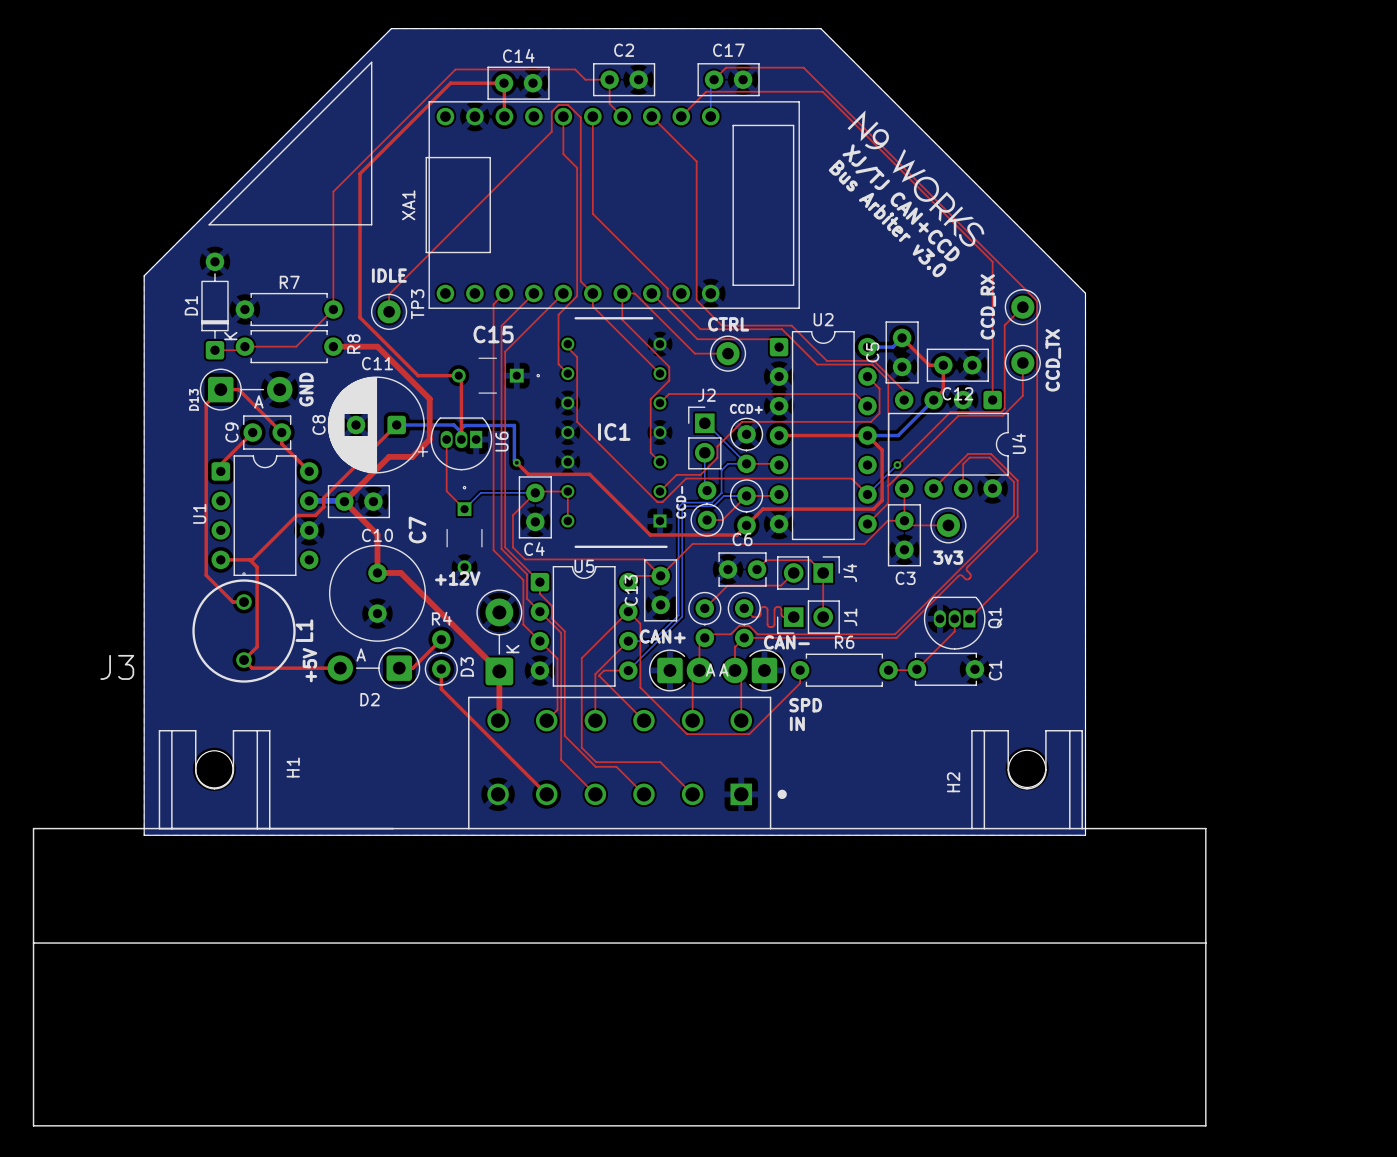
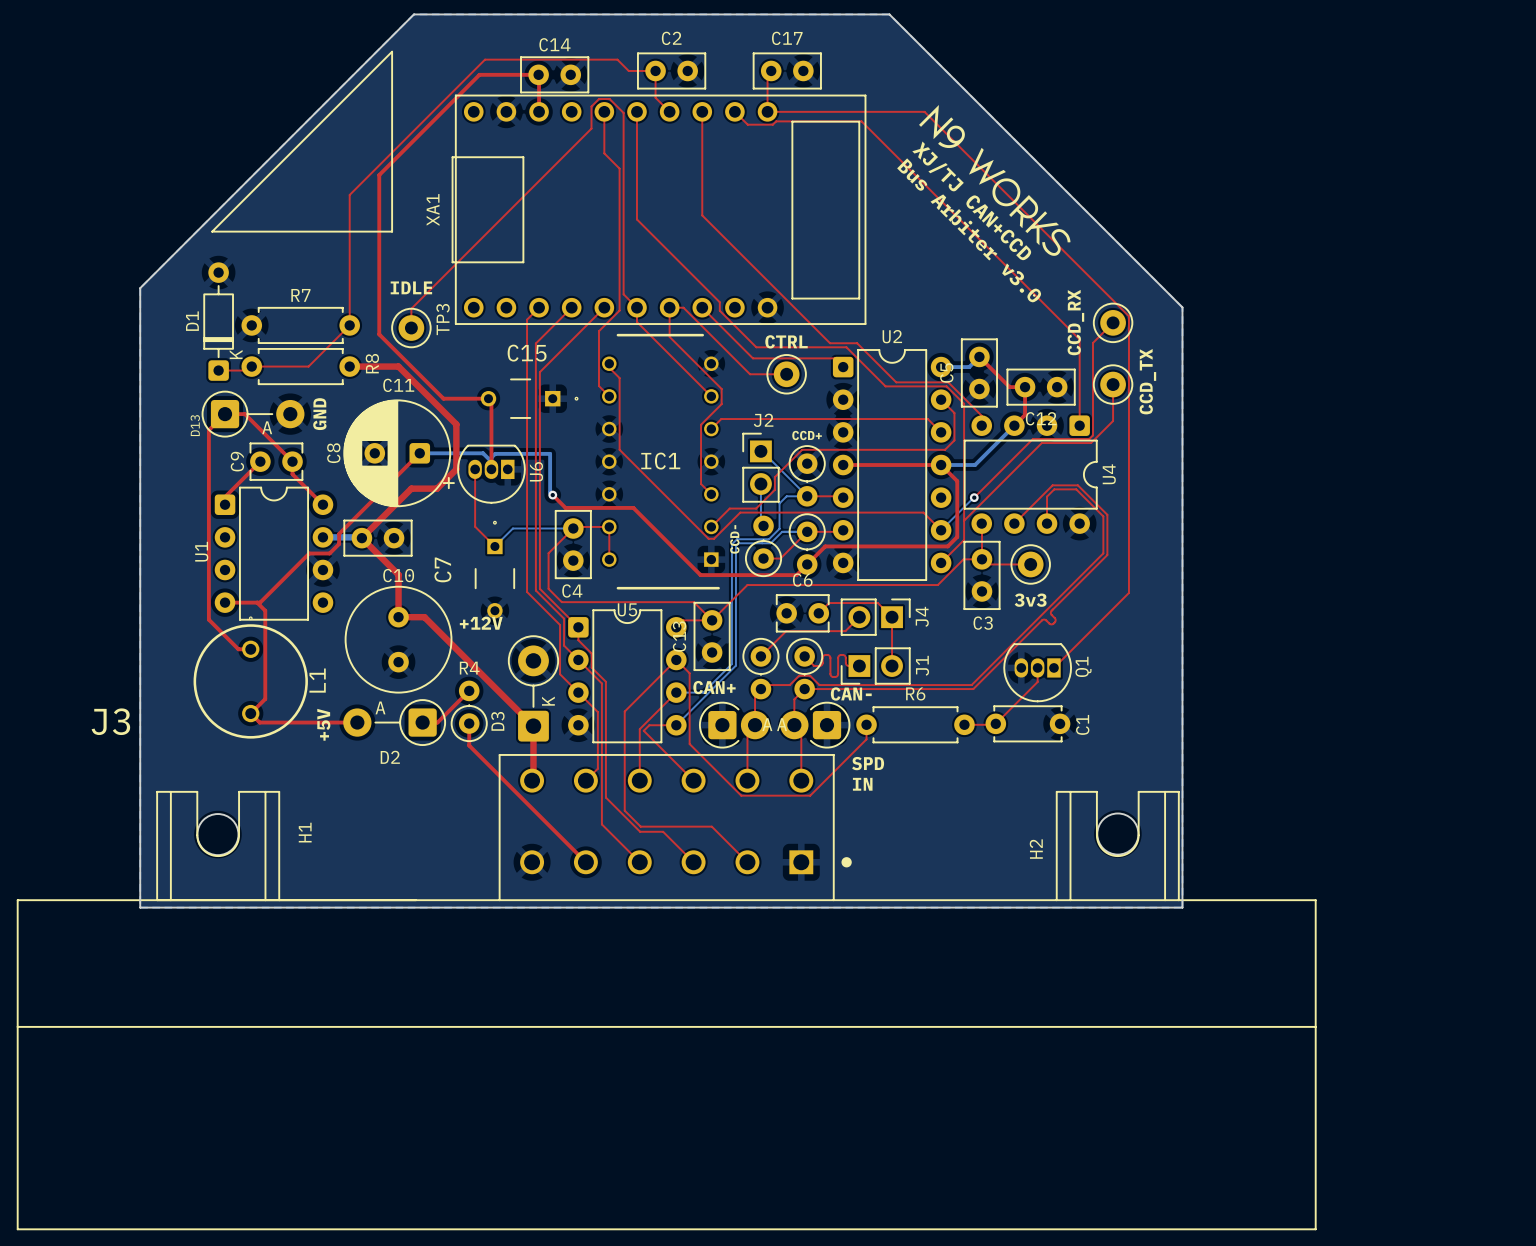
top track: (714, 79) (726, 67) (803, 67) (852, 116) -> (767, 74) (767, 111) (924, 111)
bottom track: (714, 79) (710, 83) (710, 116) -> none
top track: (651, 116) (696, 161) (696, 300) (722, 325) (767, 325) -> (702, 111) (702, 215) (830, 343)
top track: (681, 116) (706, 91) (822, 91) (992, 261) (992, 322) -> (734, 111) (747, 124) (772, 124) (776, 121) (861, 121) (1079, 339)

